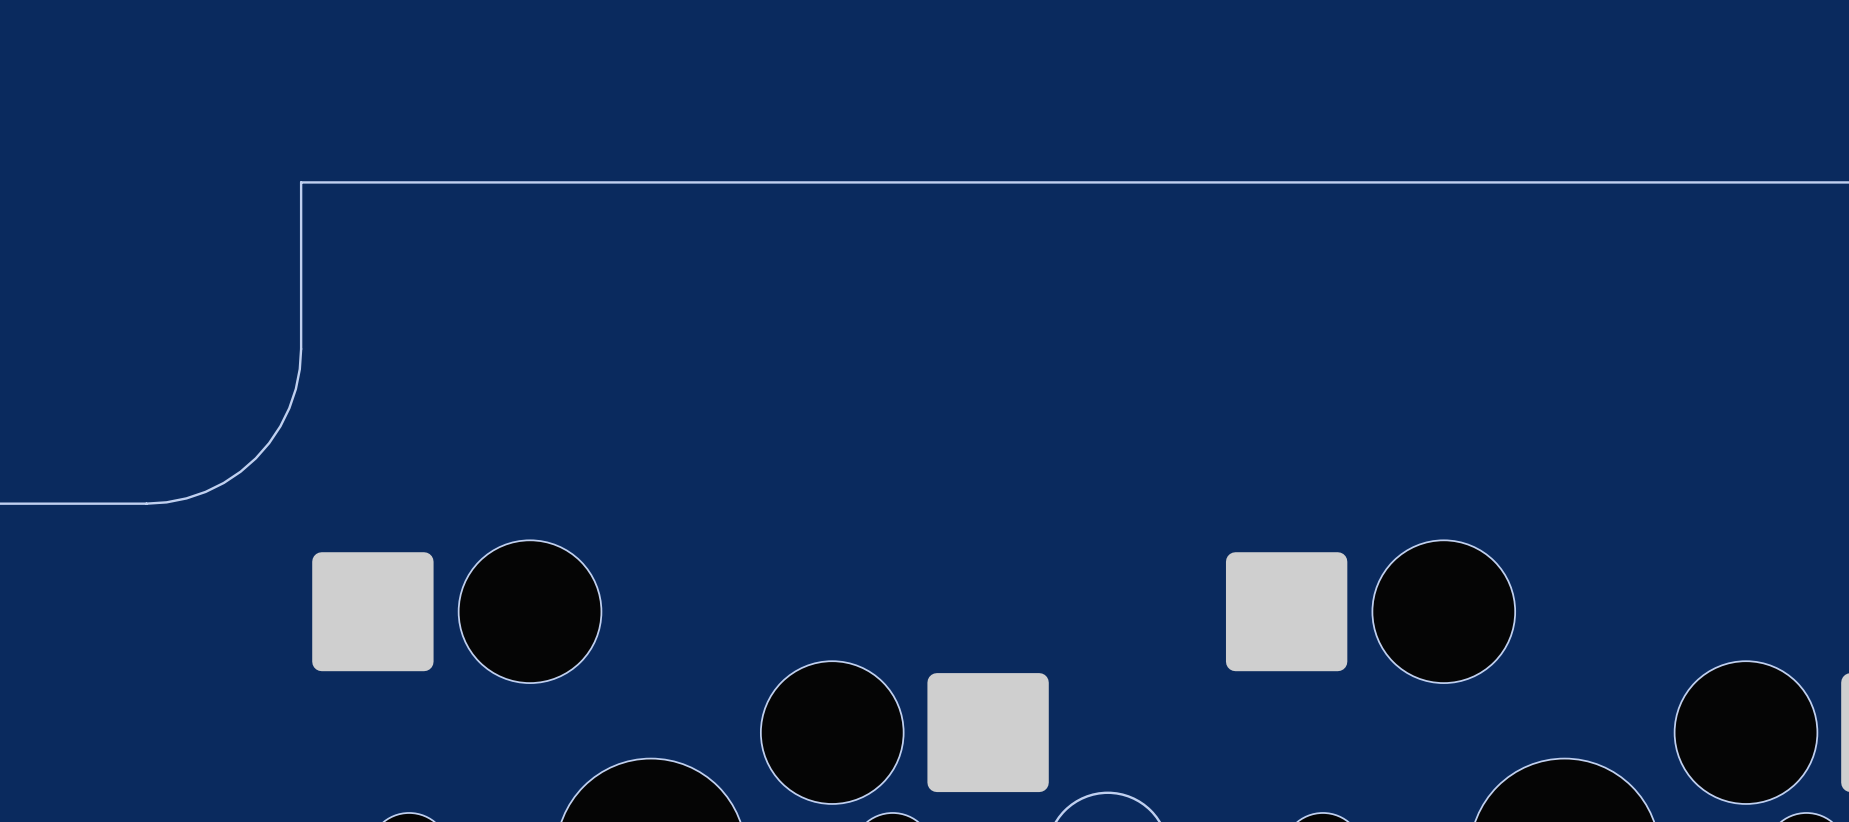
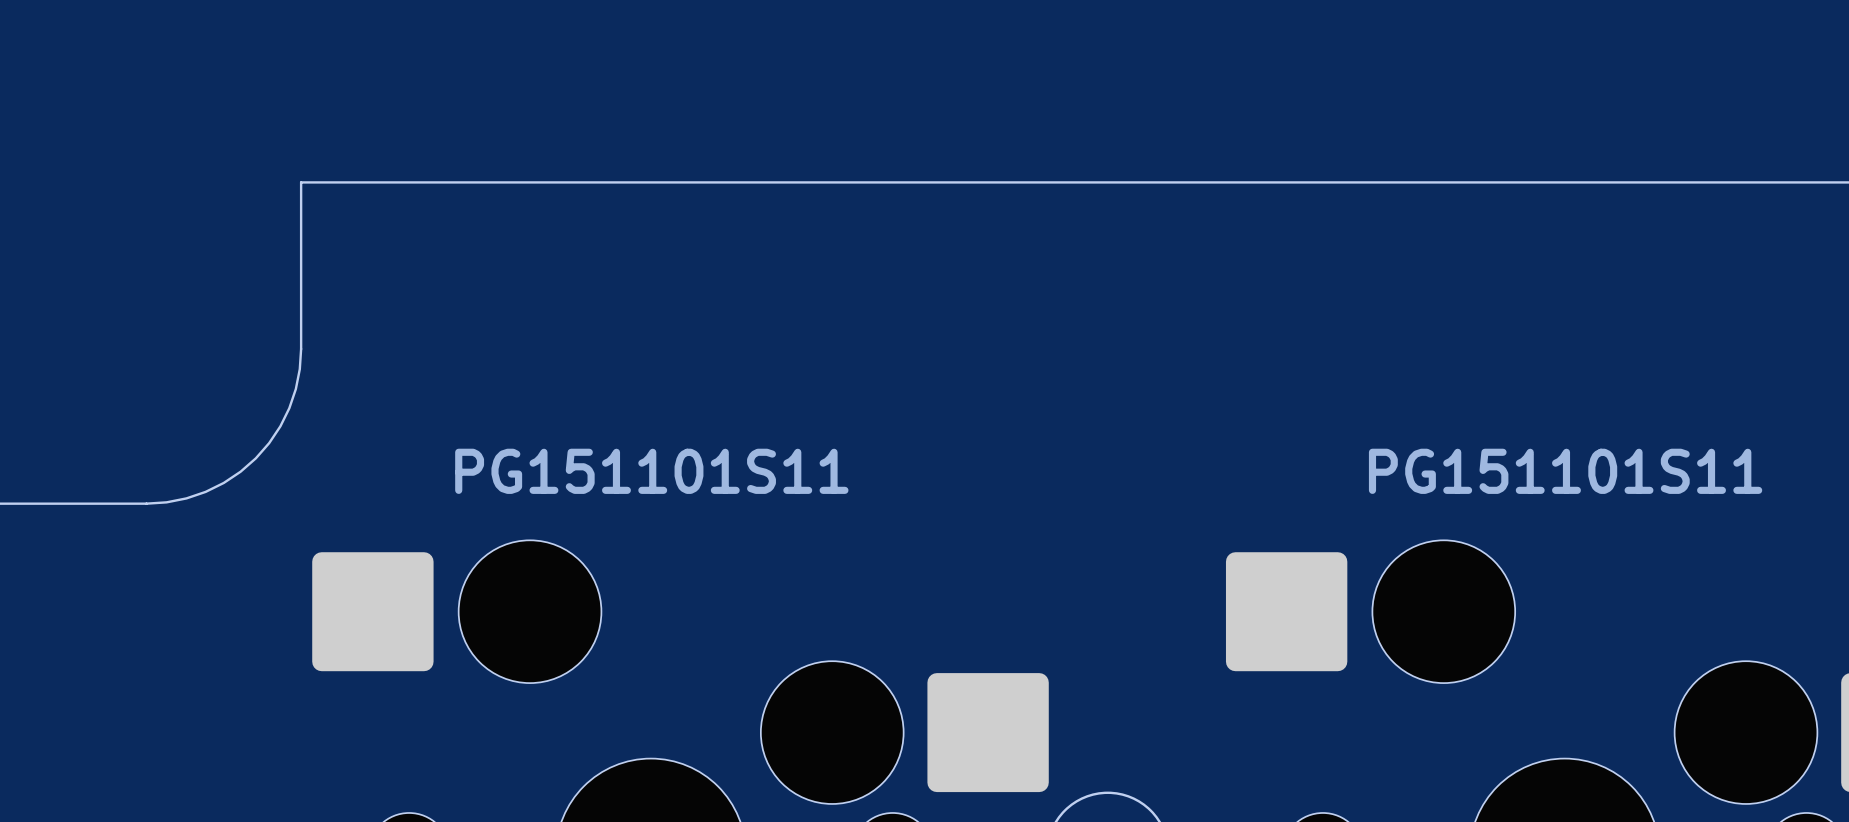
part value: none -> PG151101S11 (651, 471)
part value: none -> PG151101S11 (1565, 471)

